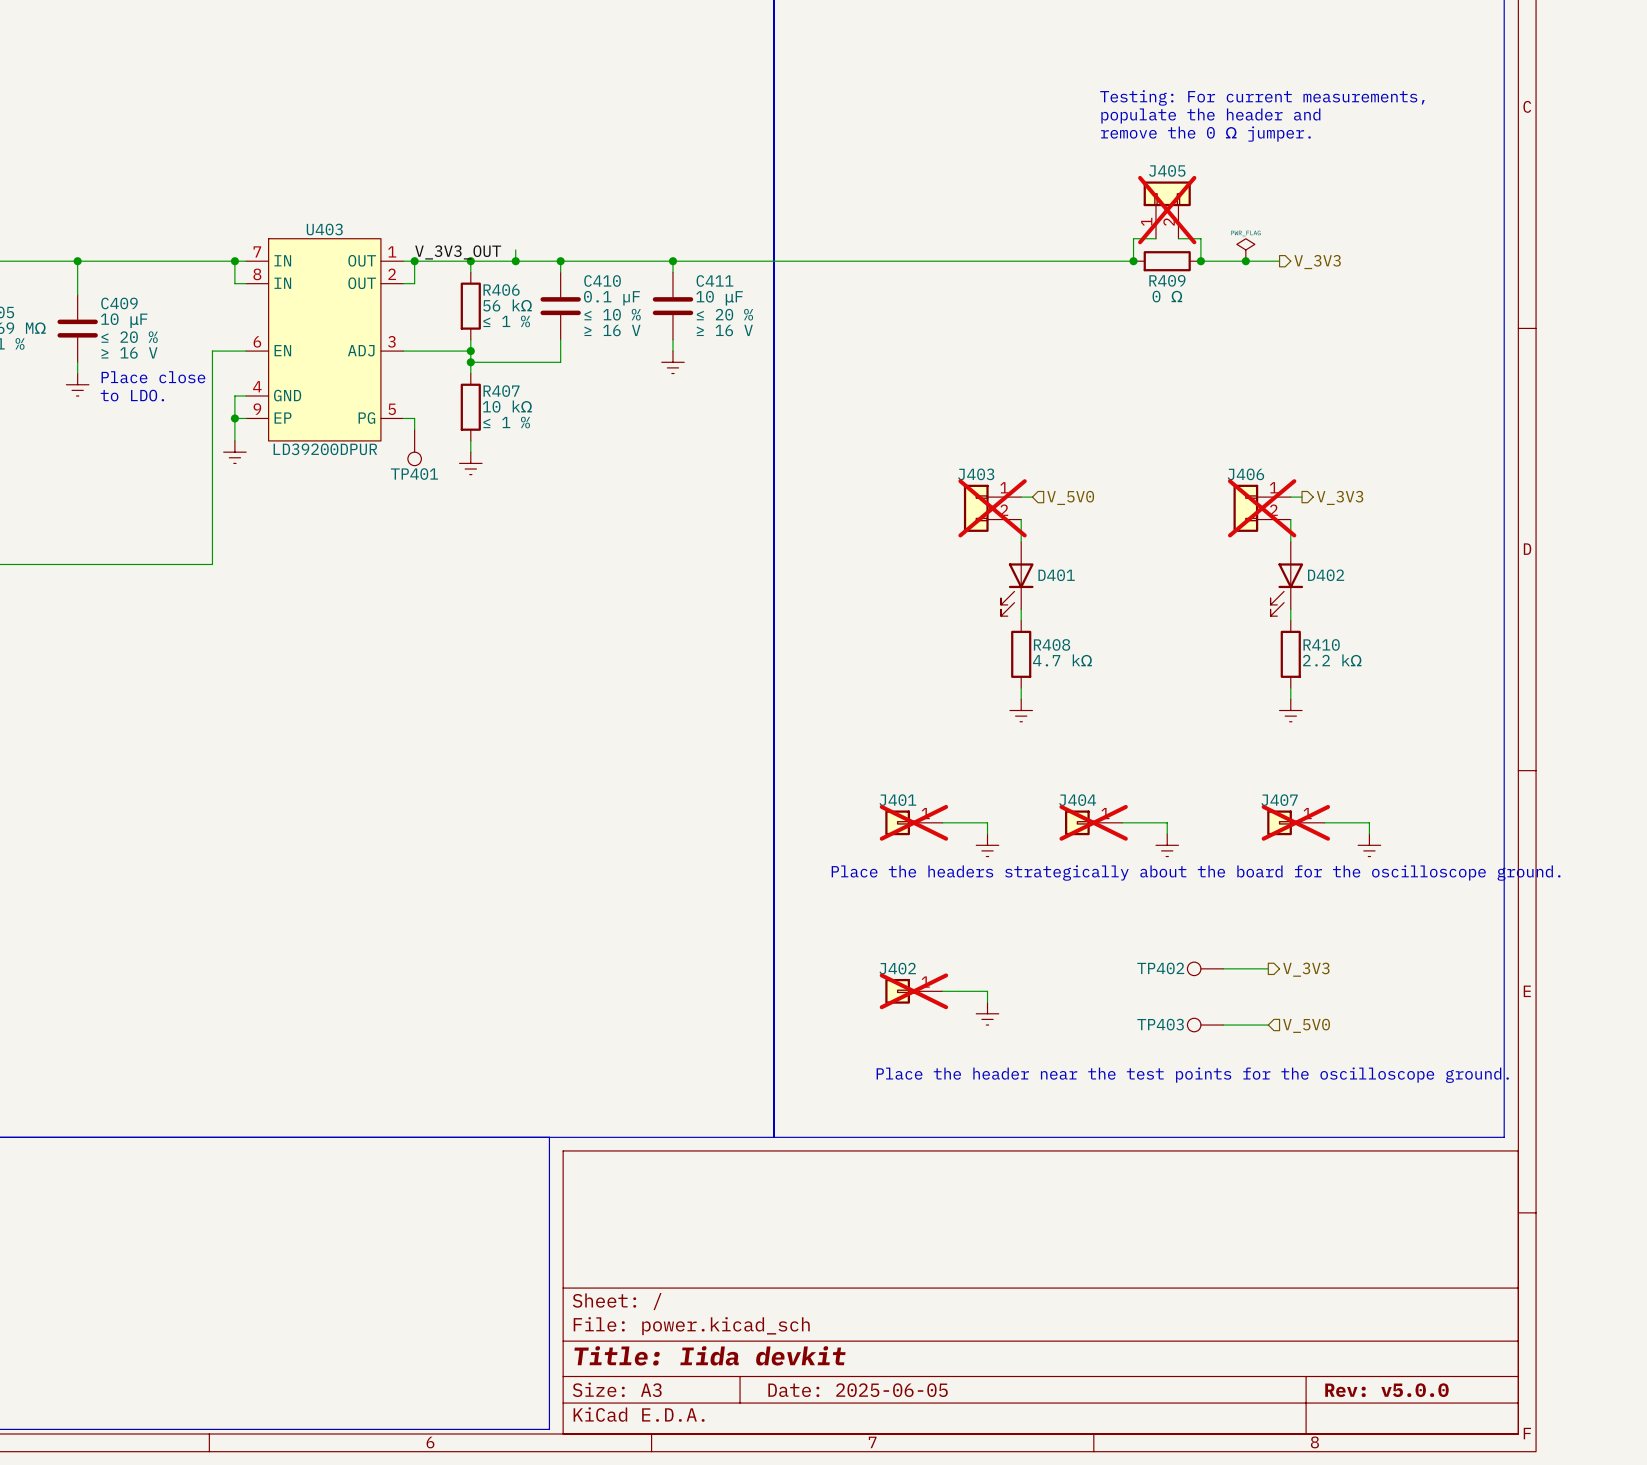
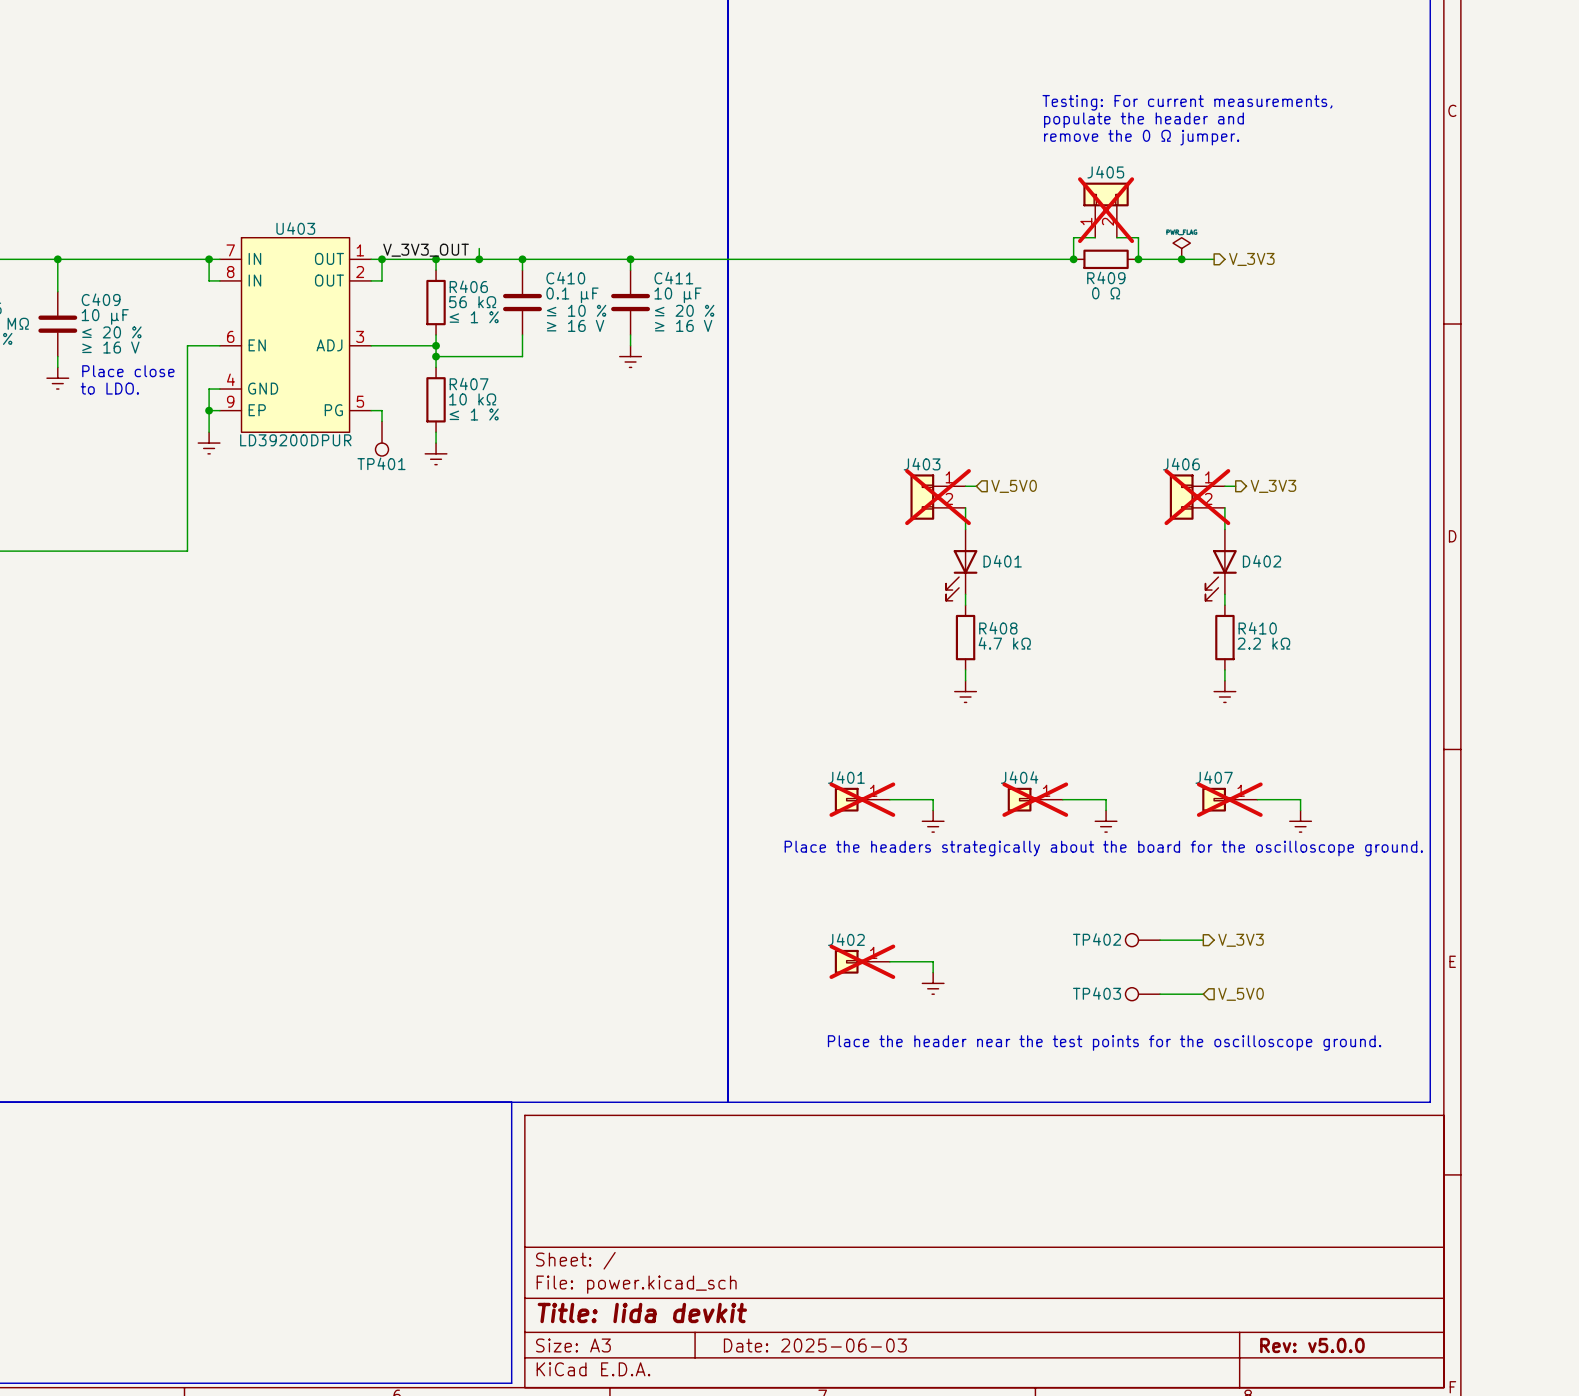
title block: Date: 2025-06-05 (858, 1390) -> Date: 2025-06-03 (815, 1345)

